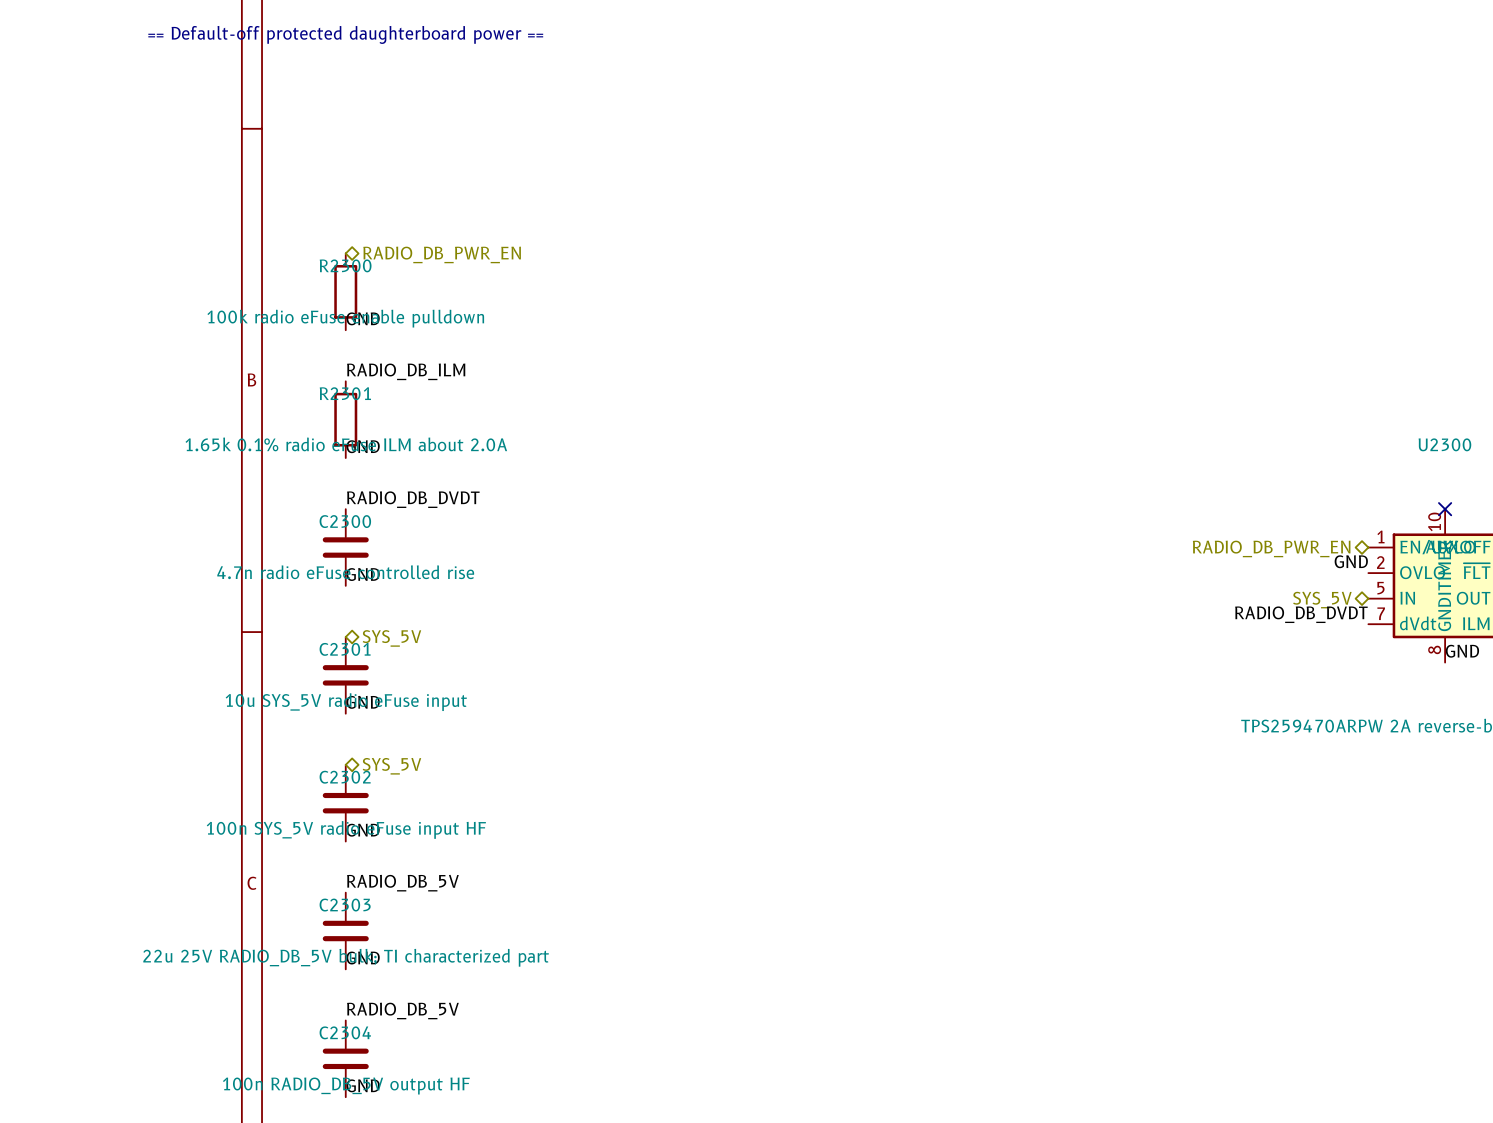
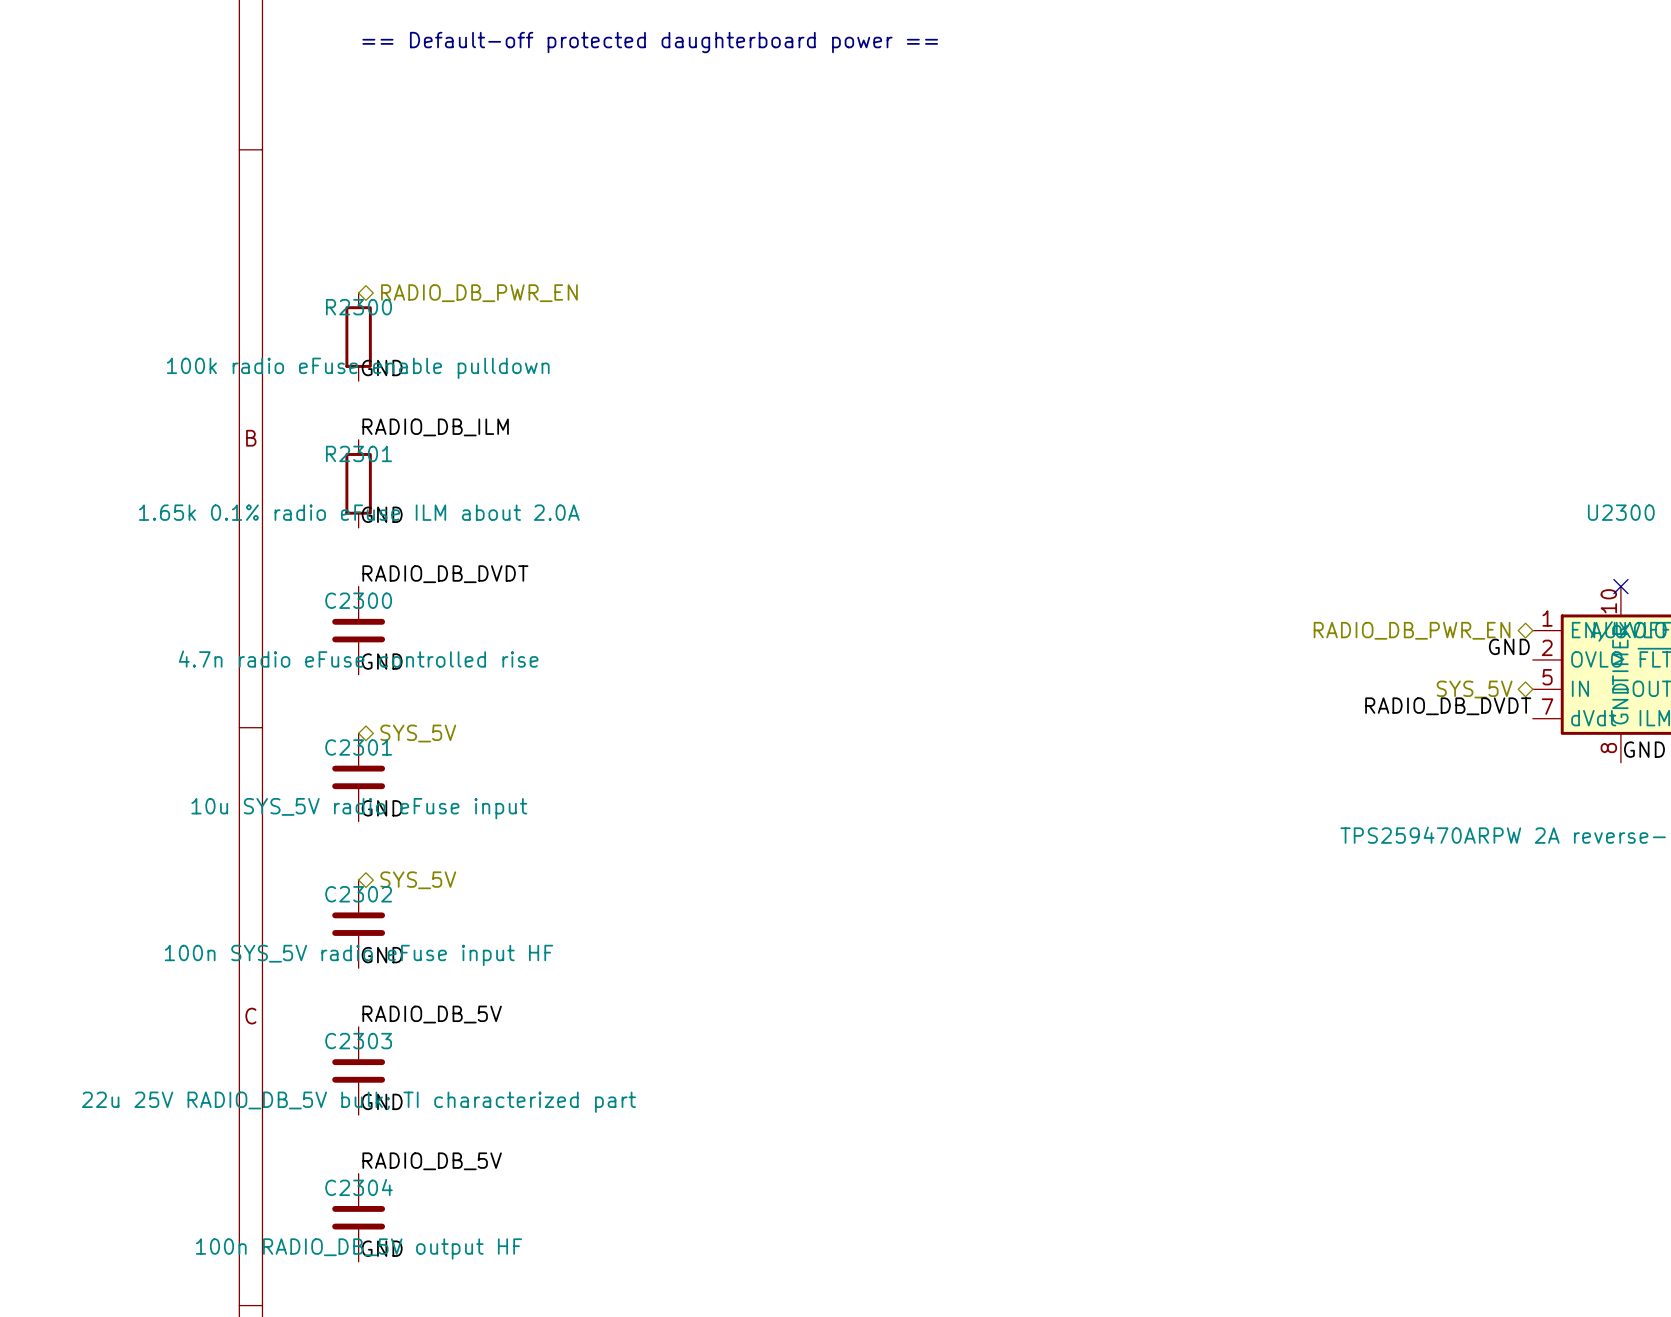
text position: == Default-off protected daughterboard power == (345, 34) -> == Default-off protected daughterboard power == (650, 42)

